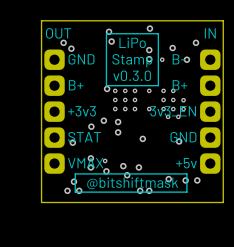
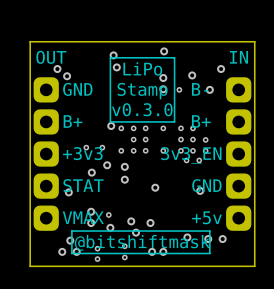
via: (115, 99) -> none
via: none -> (86, 147)
via: none -> (102, 147)
via: none -> (124, 246)
via: none -> (97, 248)
via: none -> (124, 257)
via: none -> (97, 259)

